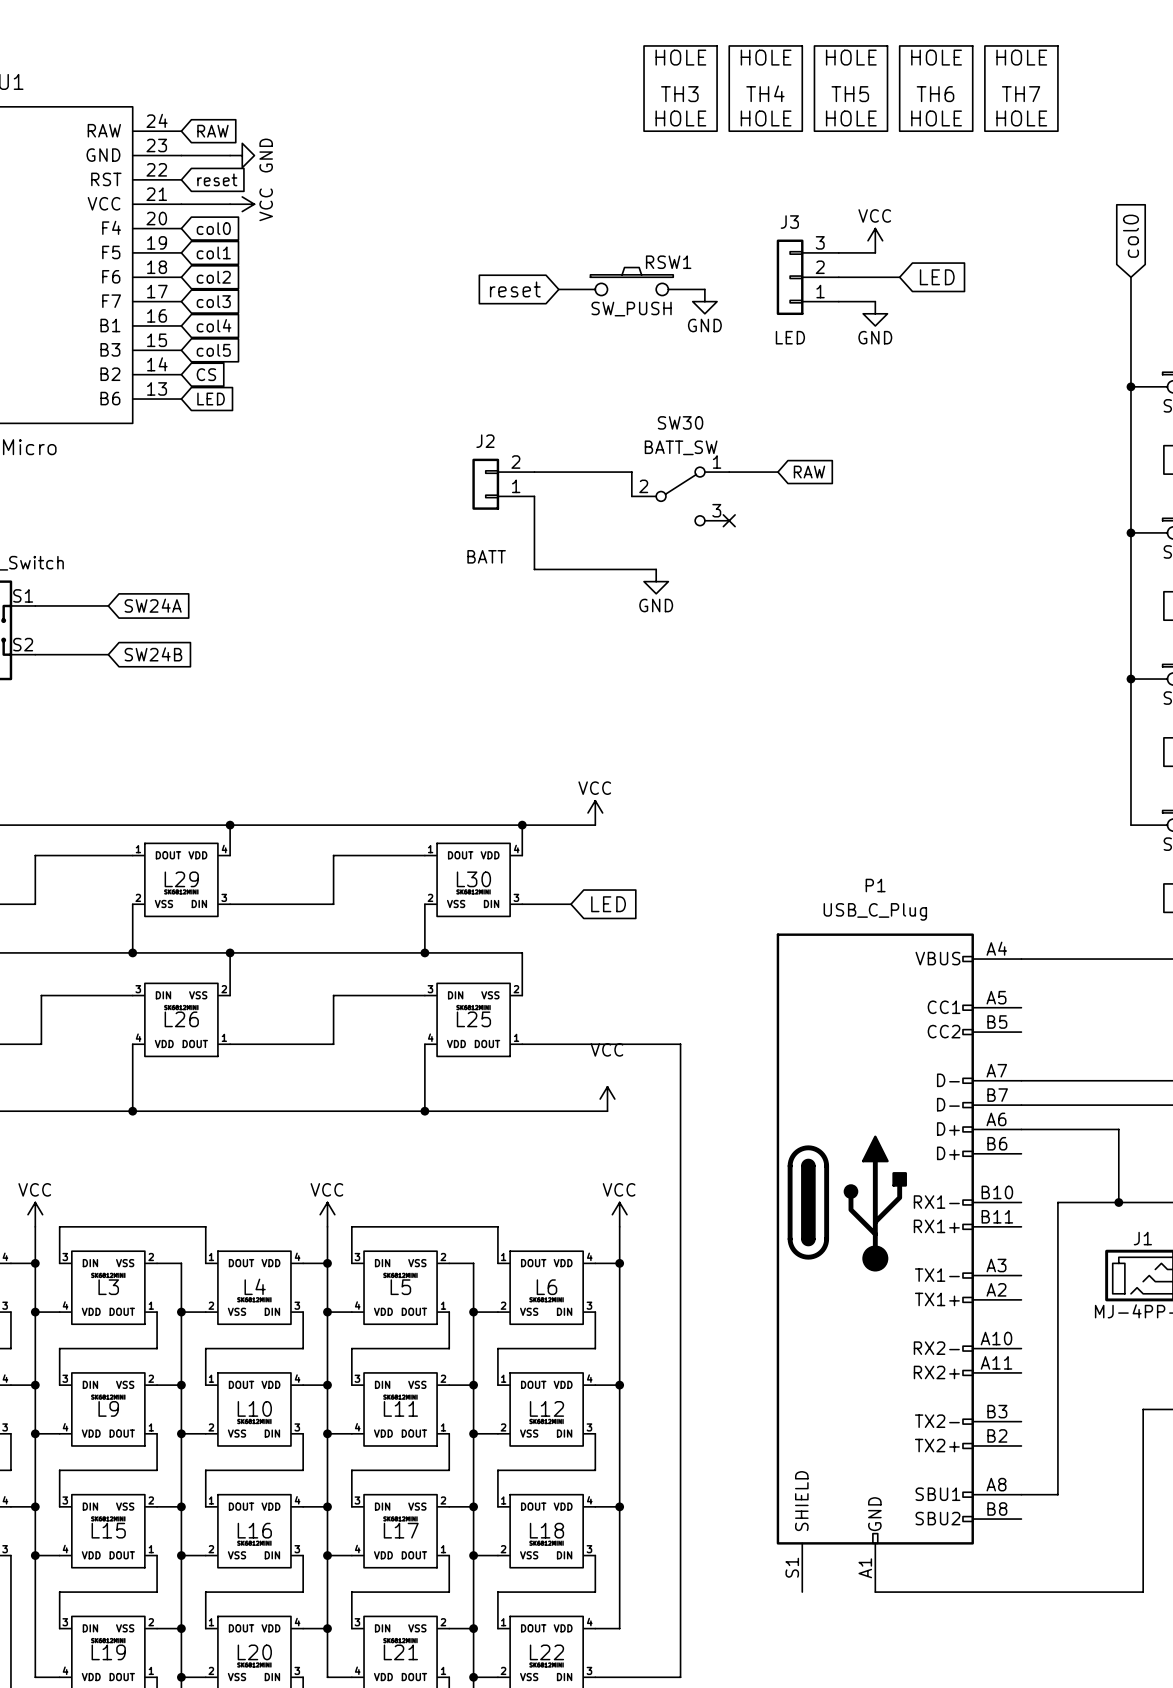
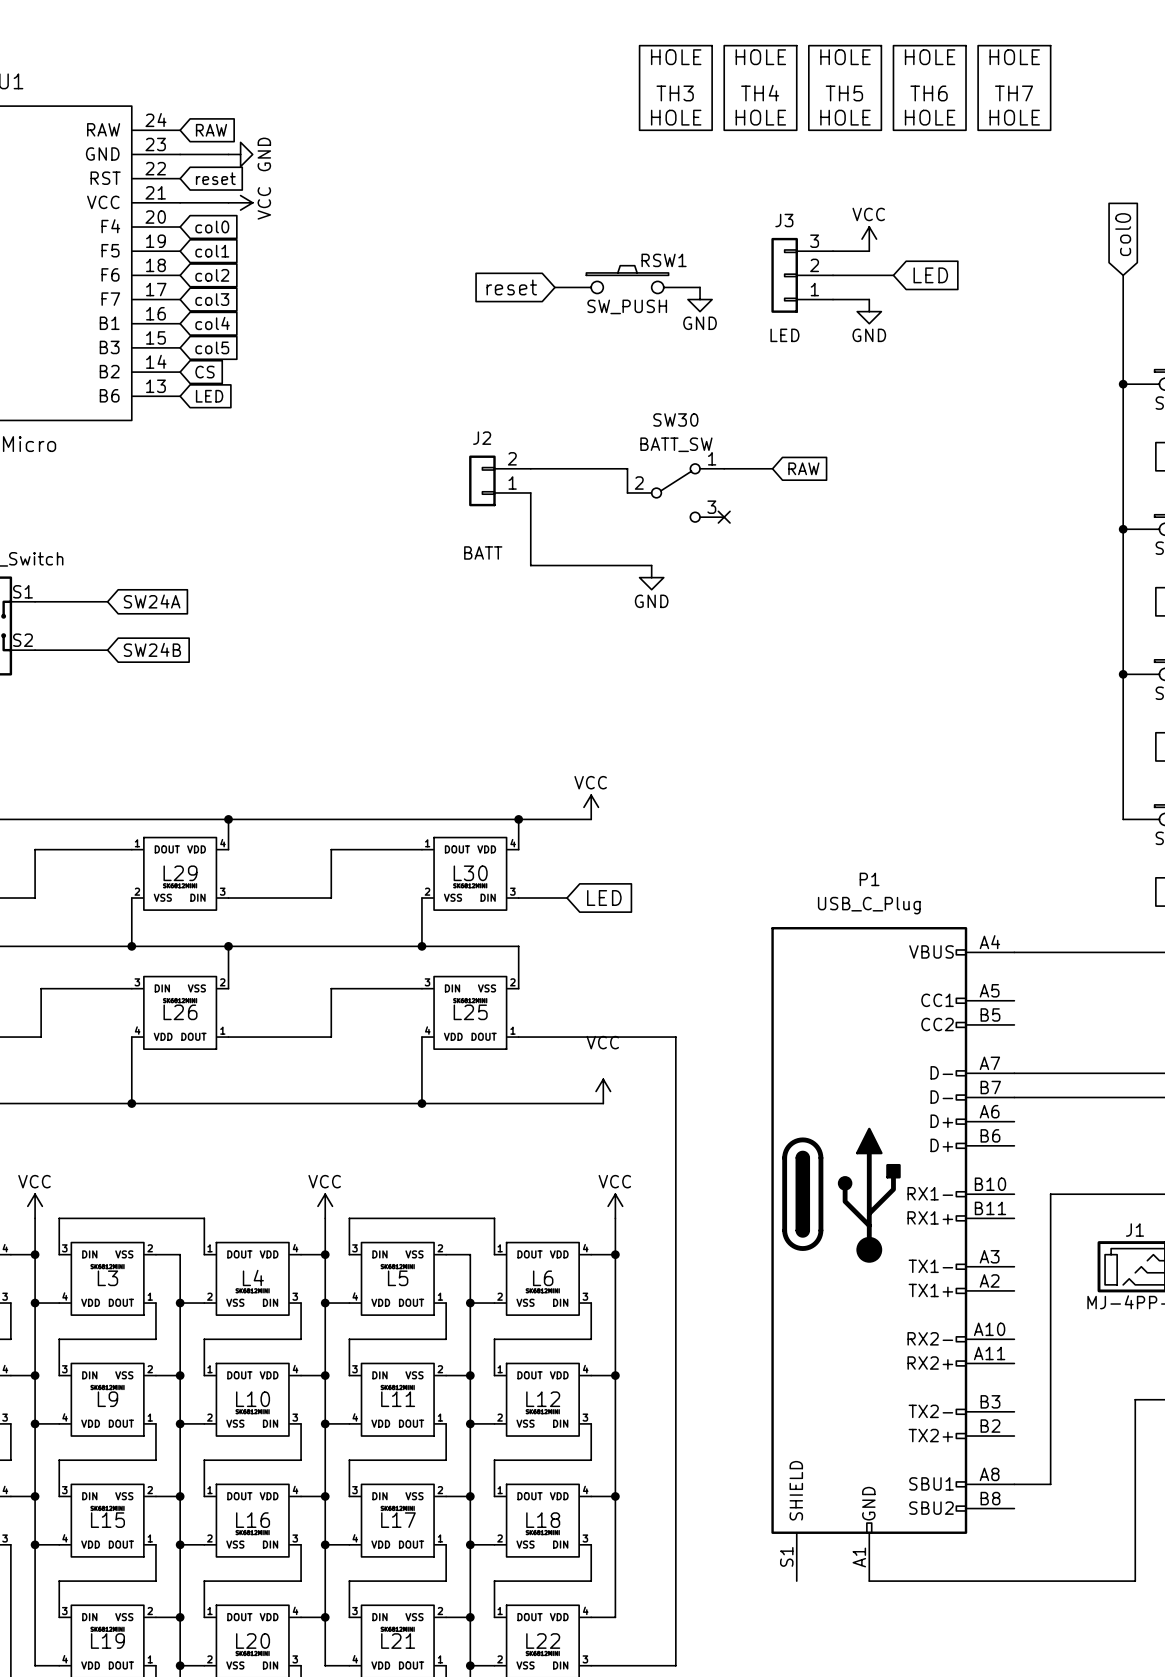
wire: (1021, 1129) (1118, 1129) (1118, 1202) -> none
junction: (1118, 1202) -> none

